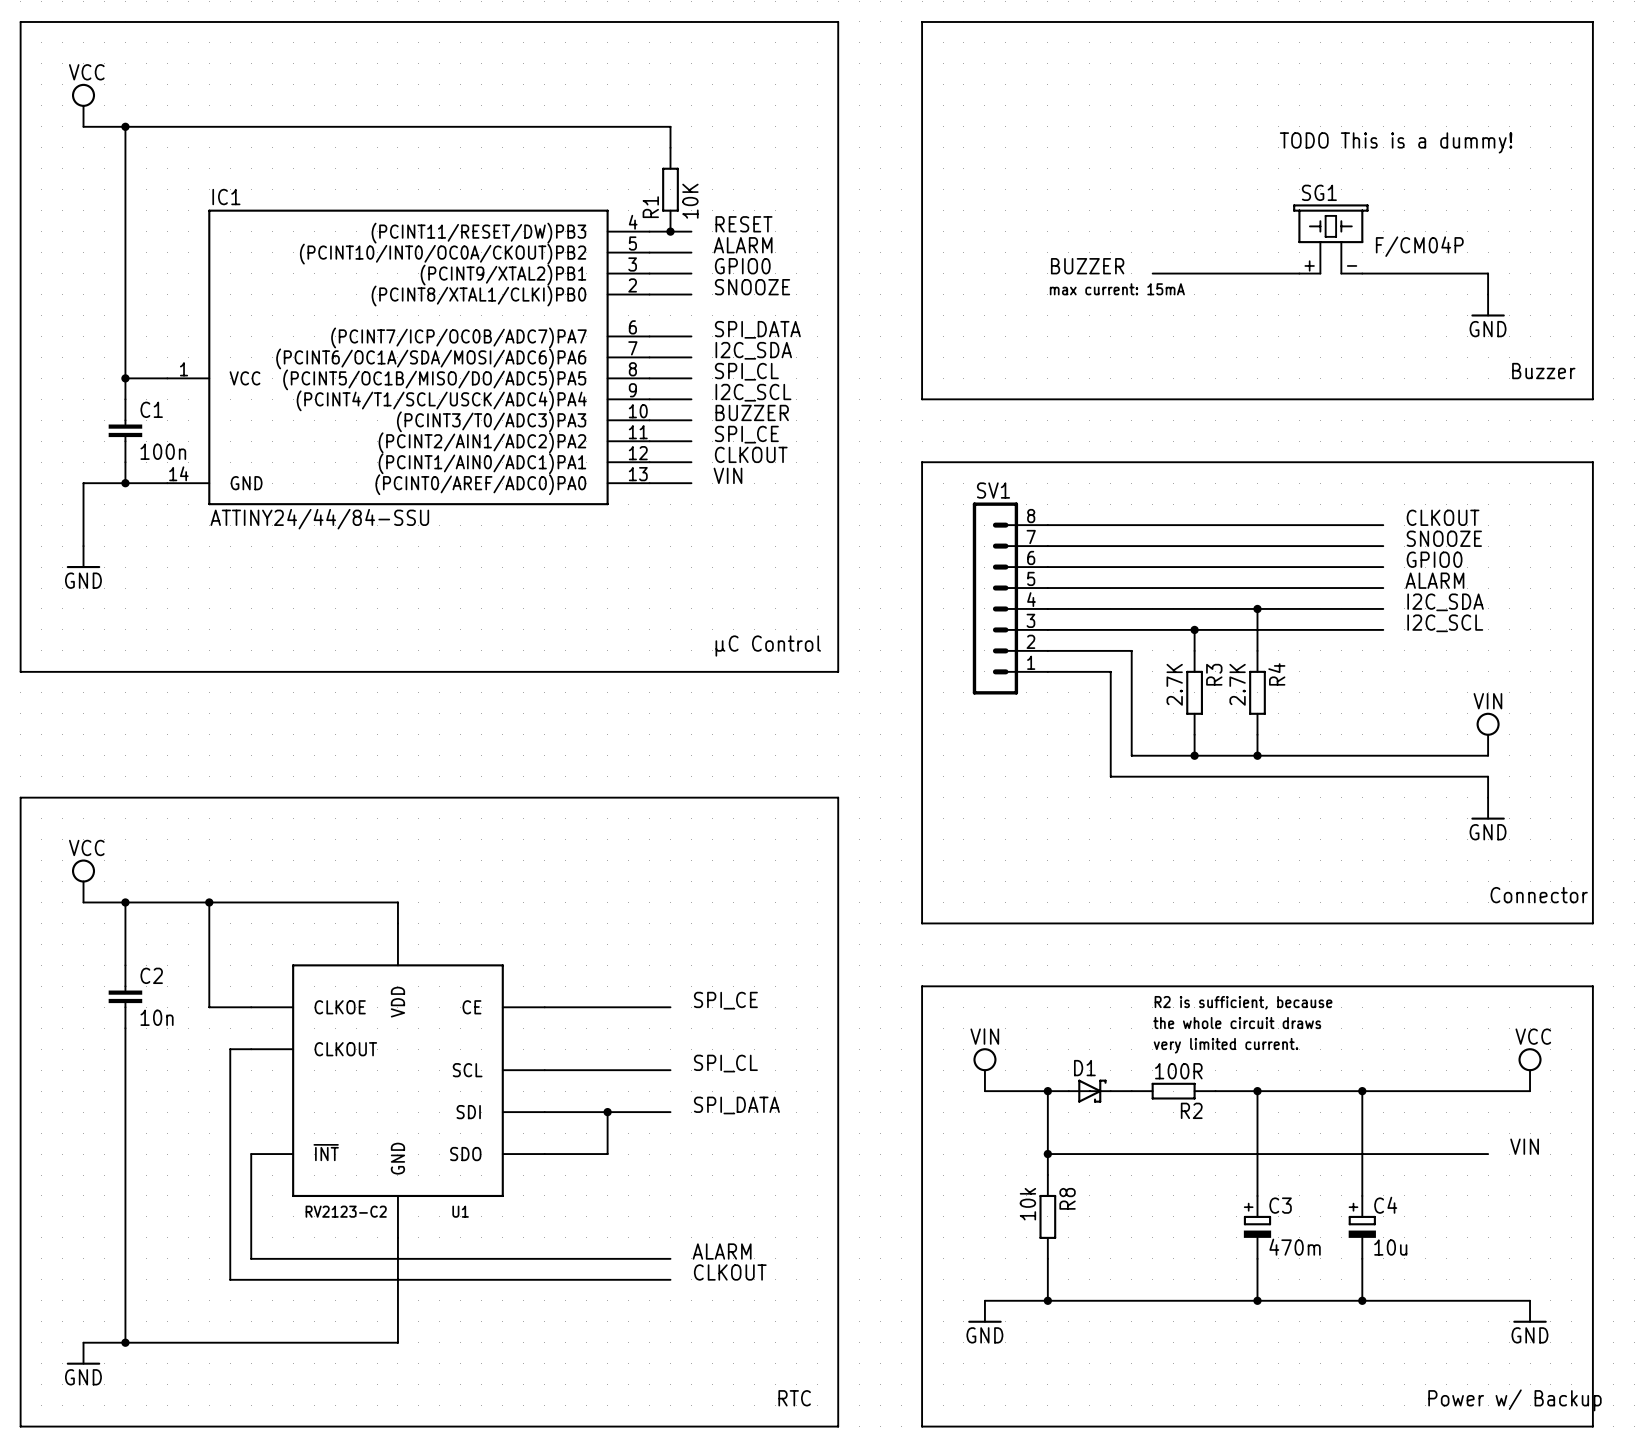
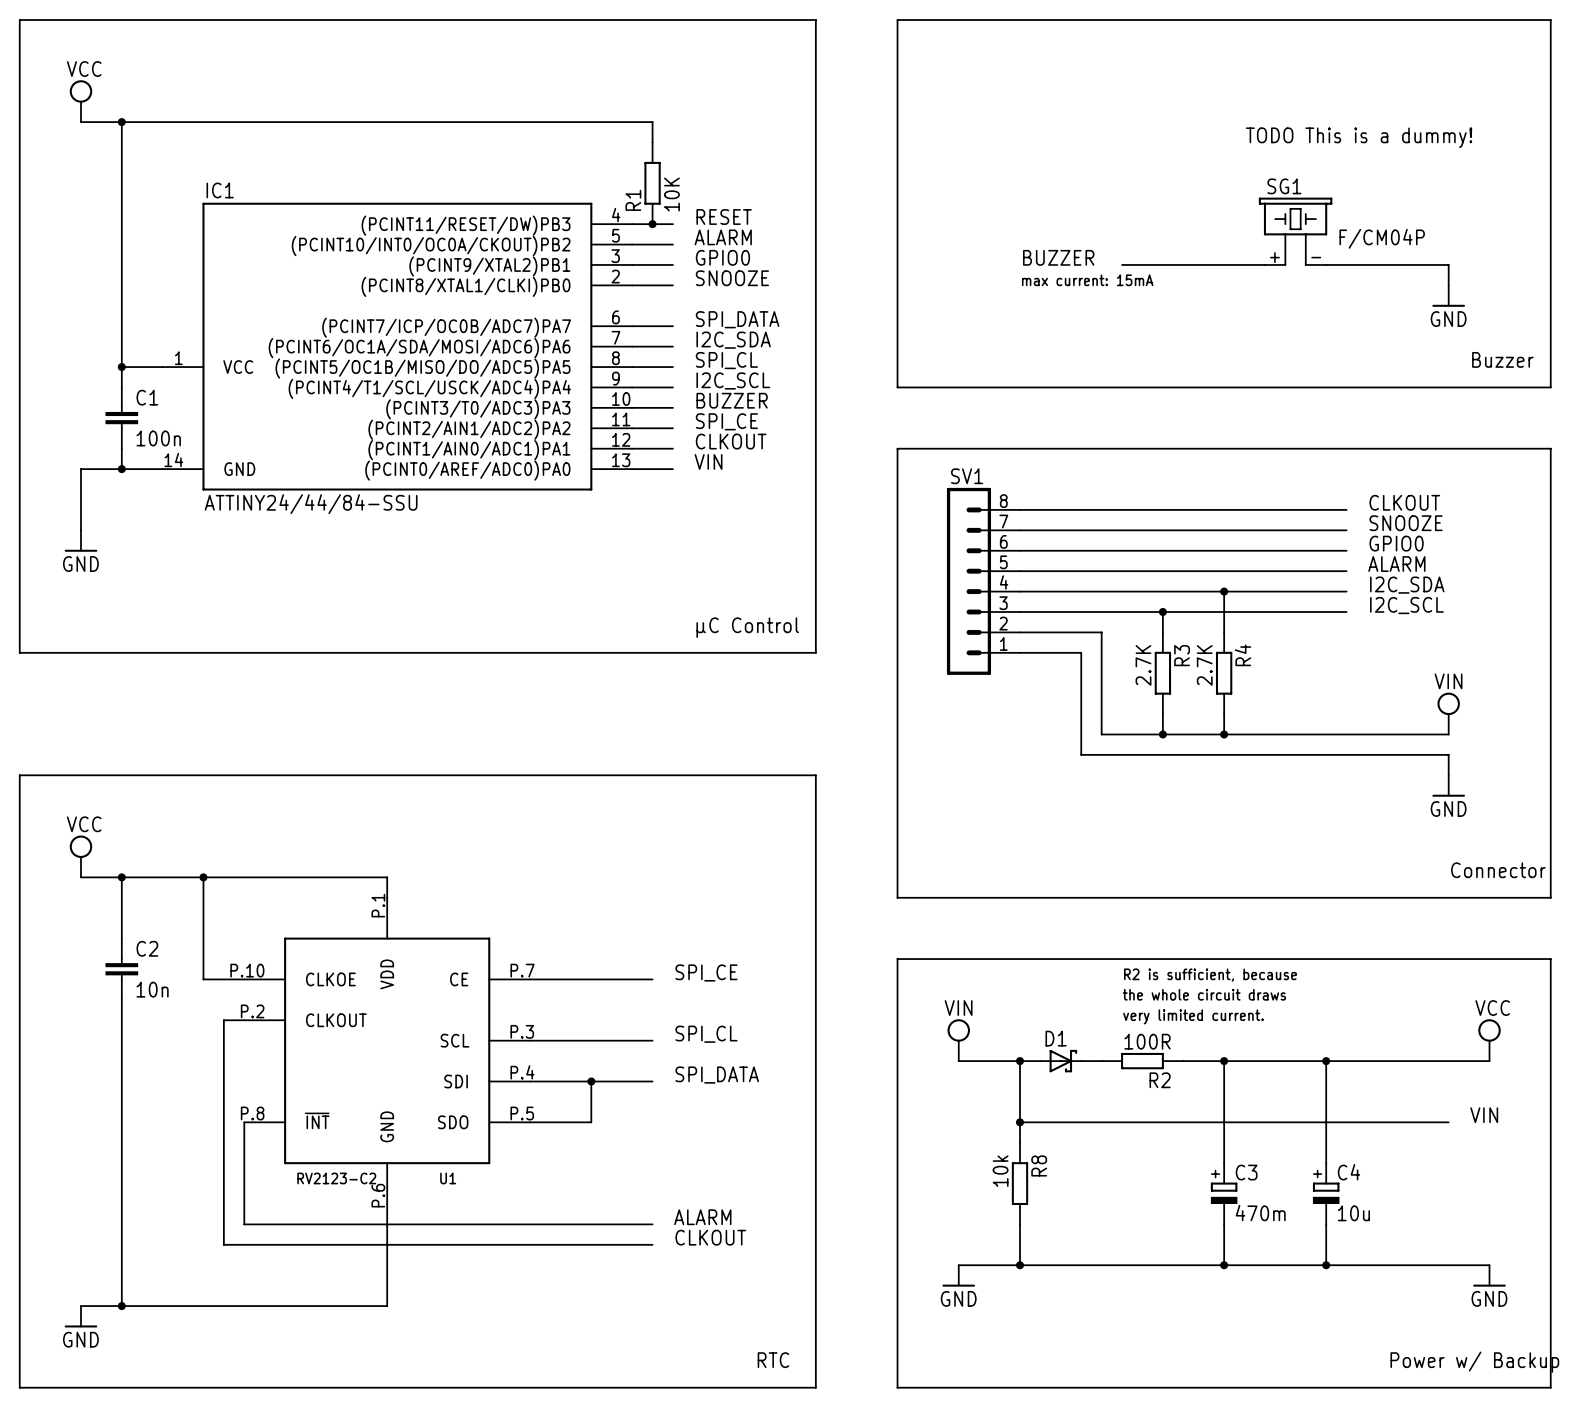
U1 symbol: [251, 923, 545, 1238] -> [244, 897, 531, 1204]

